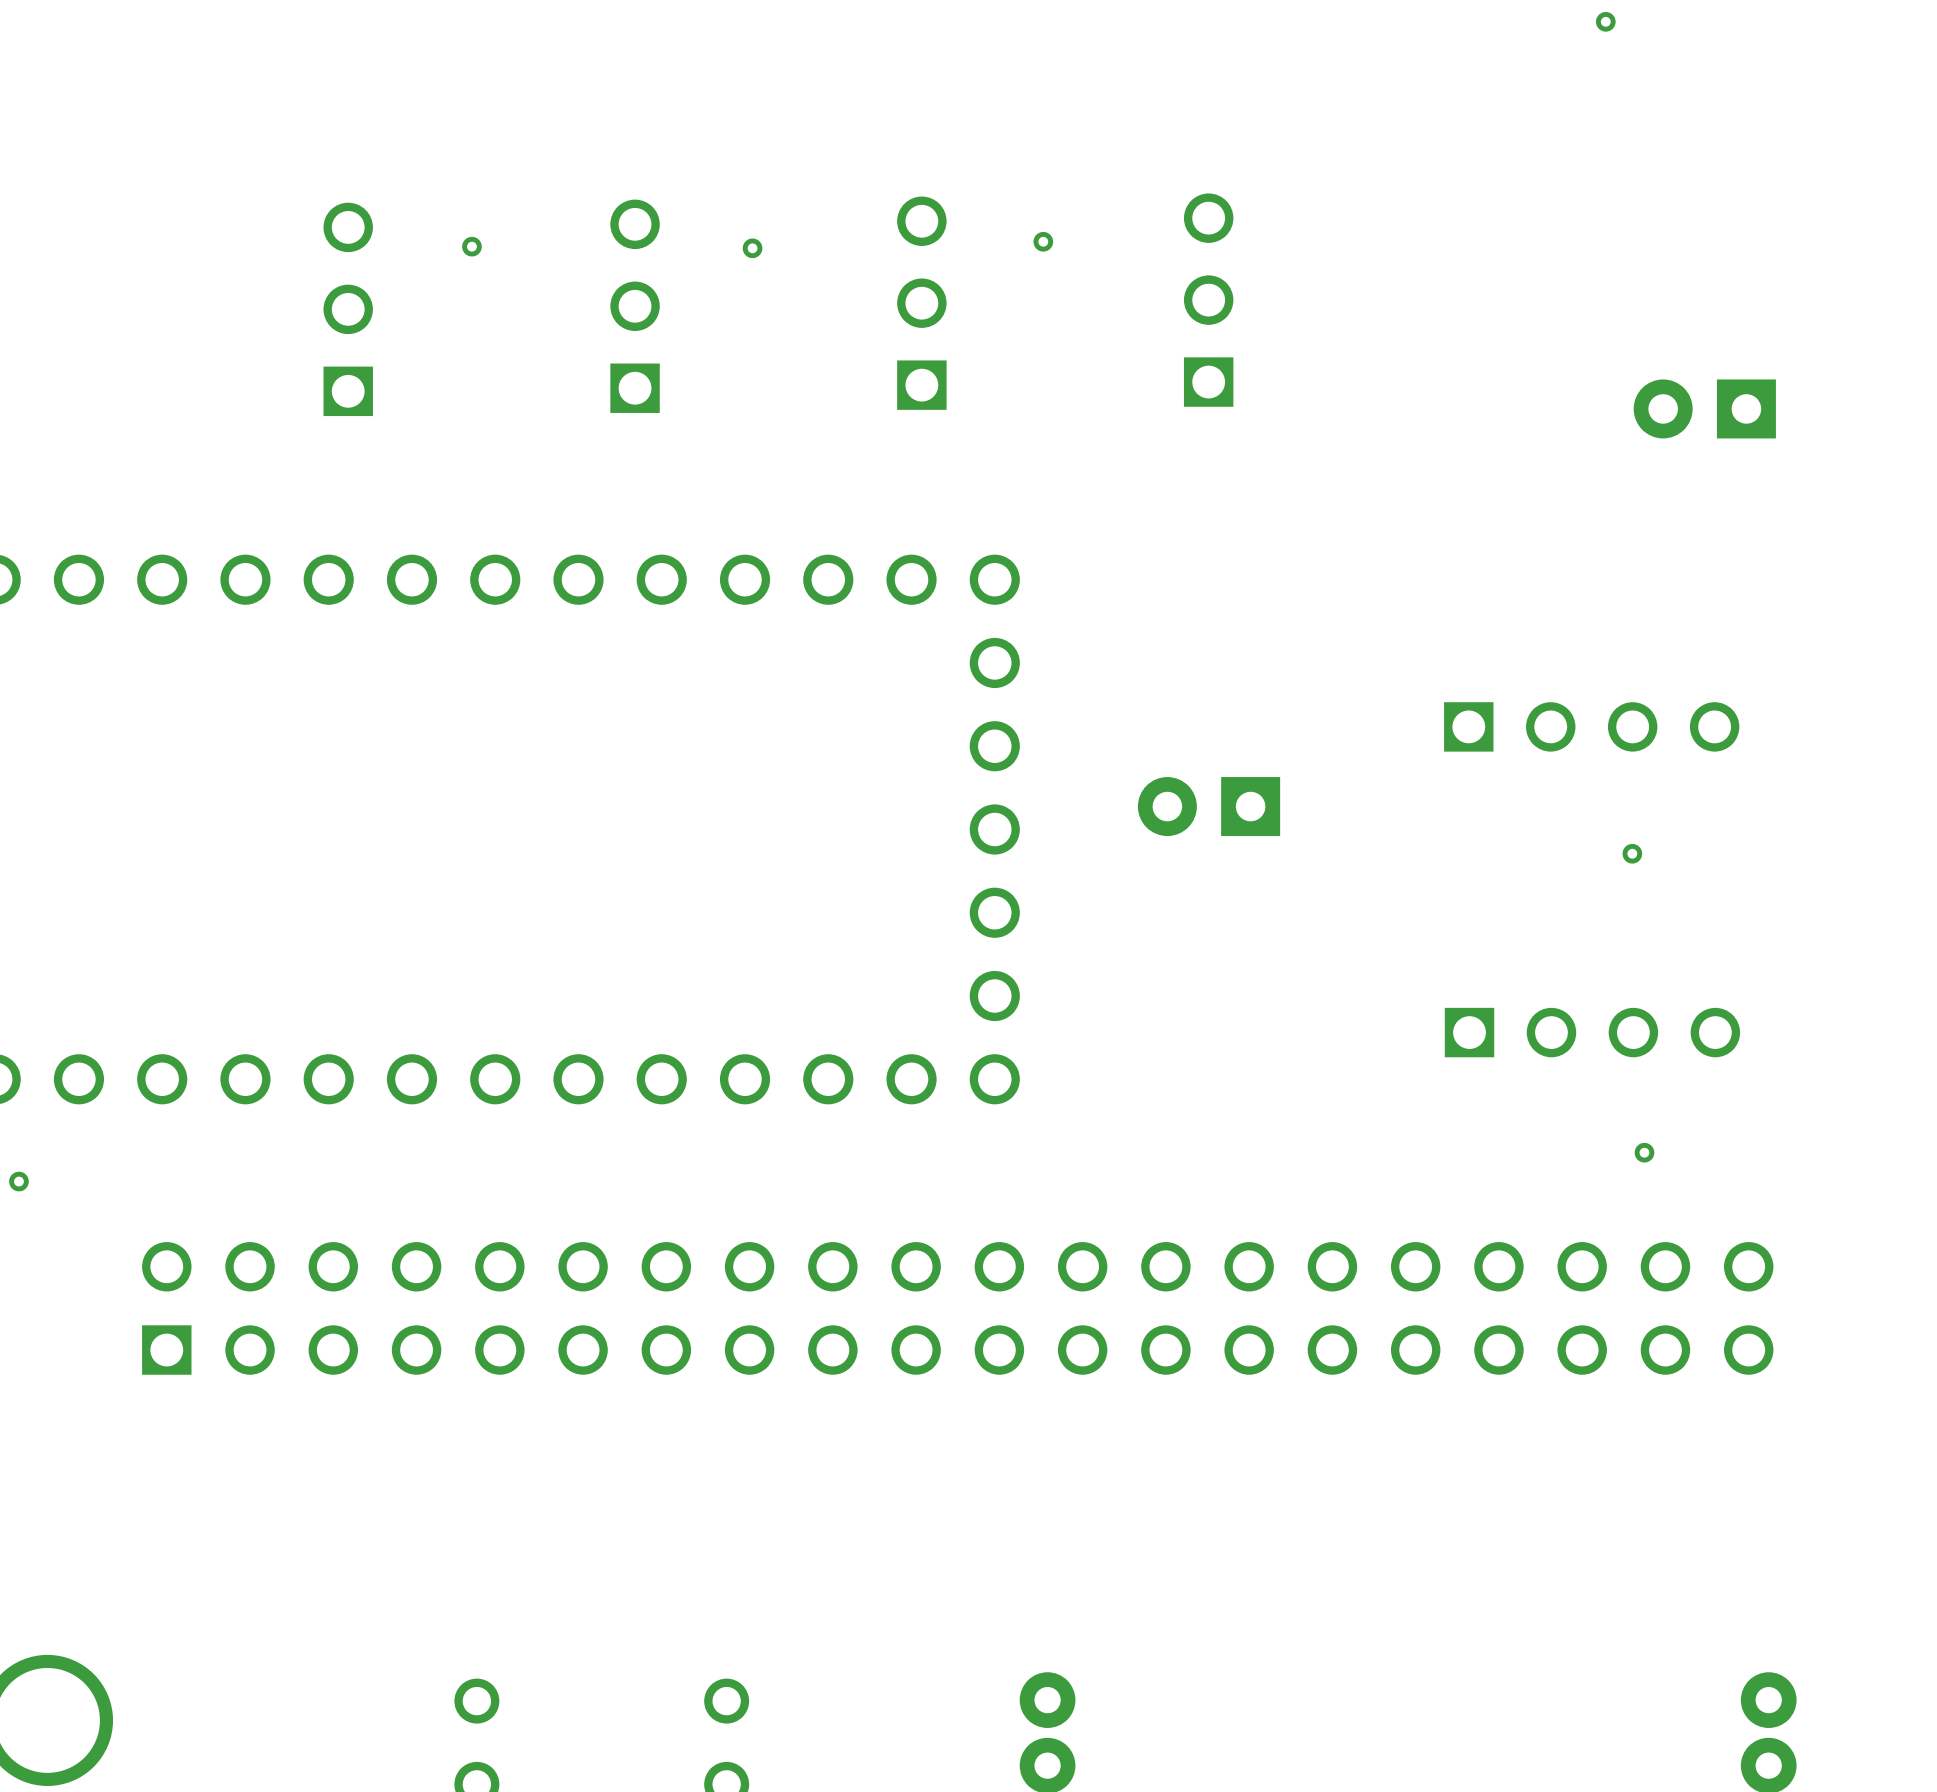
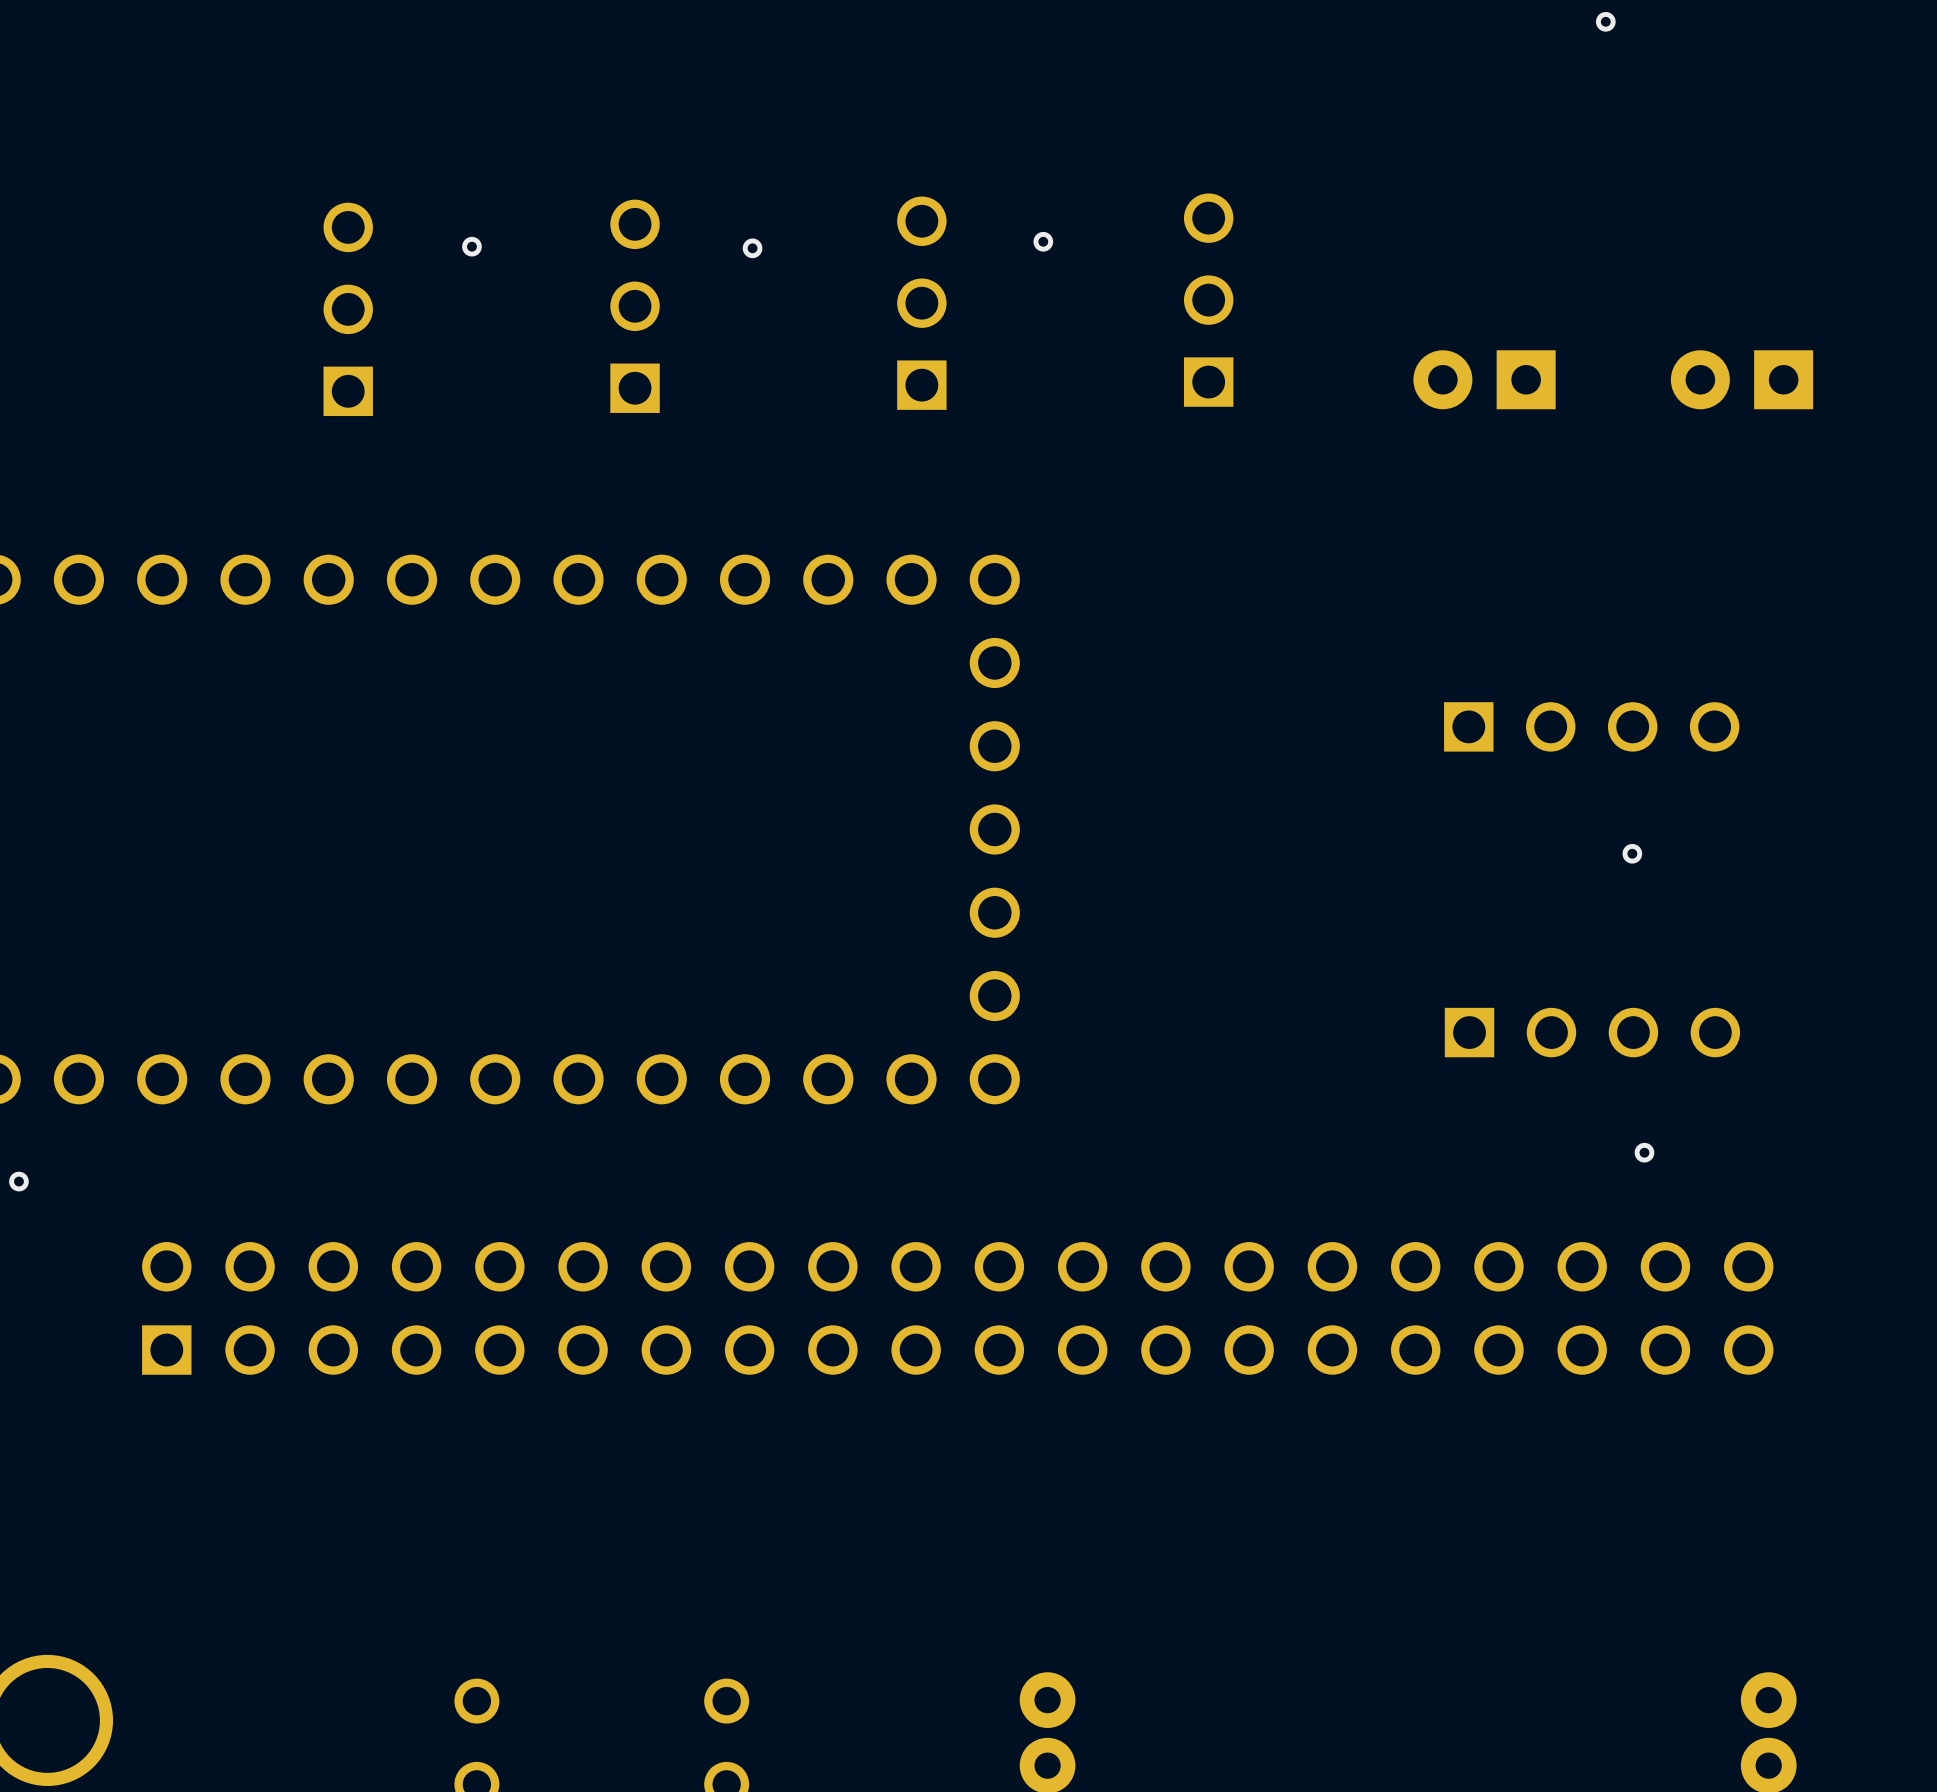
part: none -> (1484, 379)
part position: (1704, 408) -> (1742, 379)
part: (1209, 806) -> none

